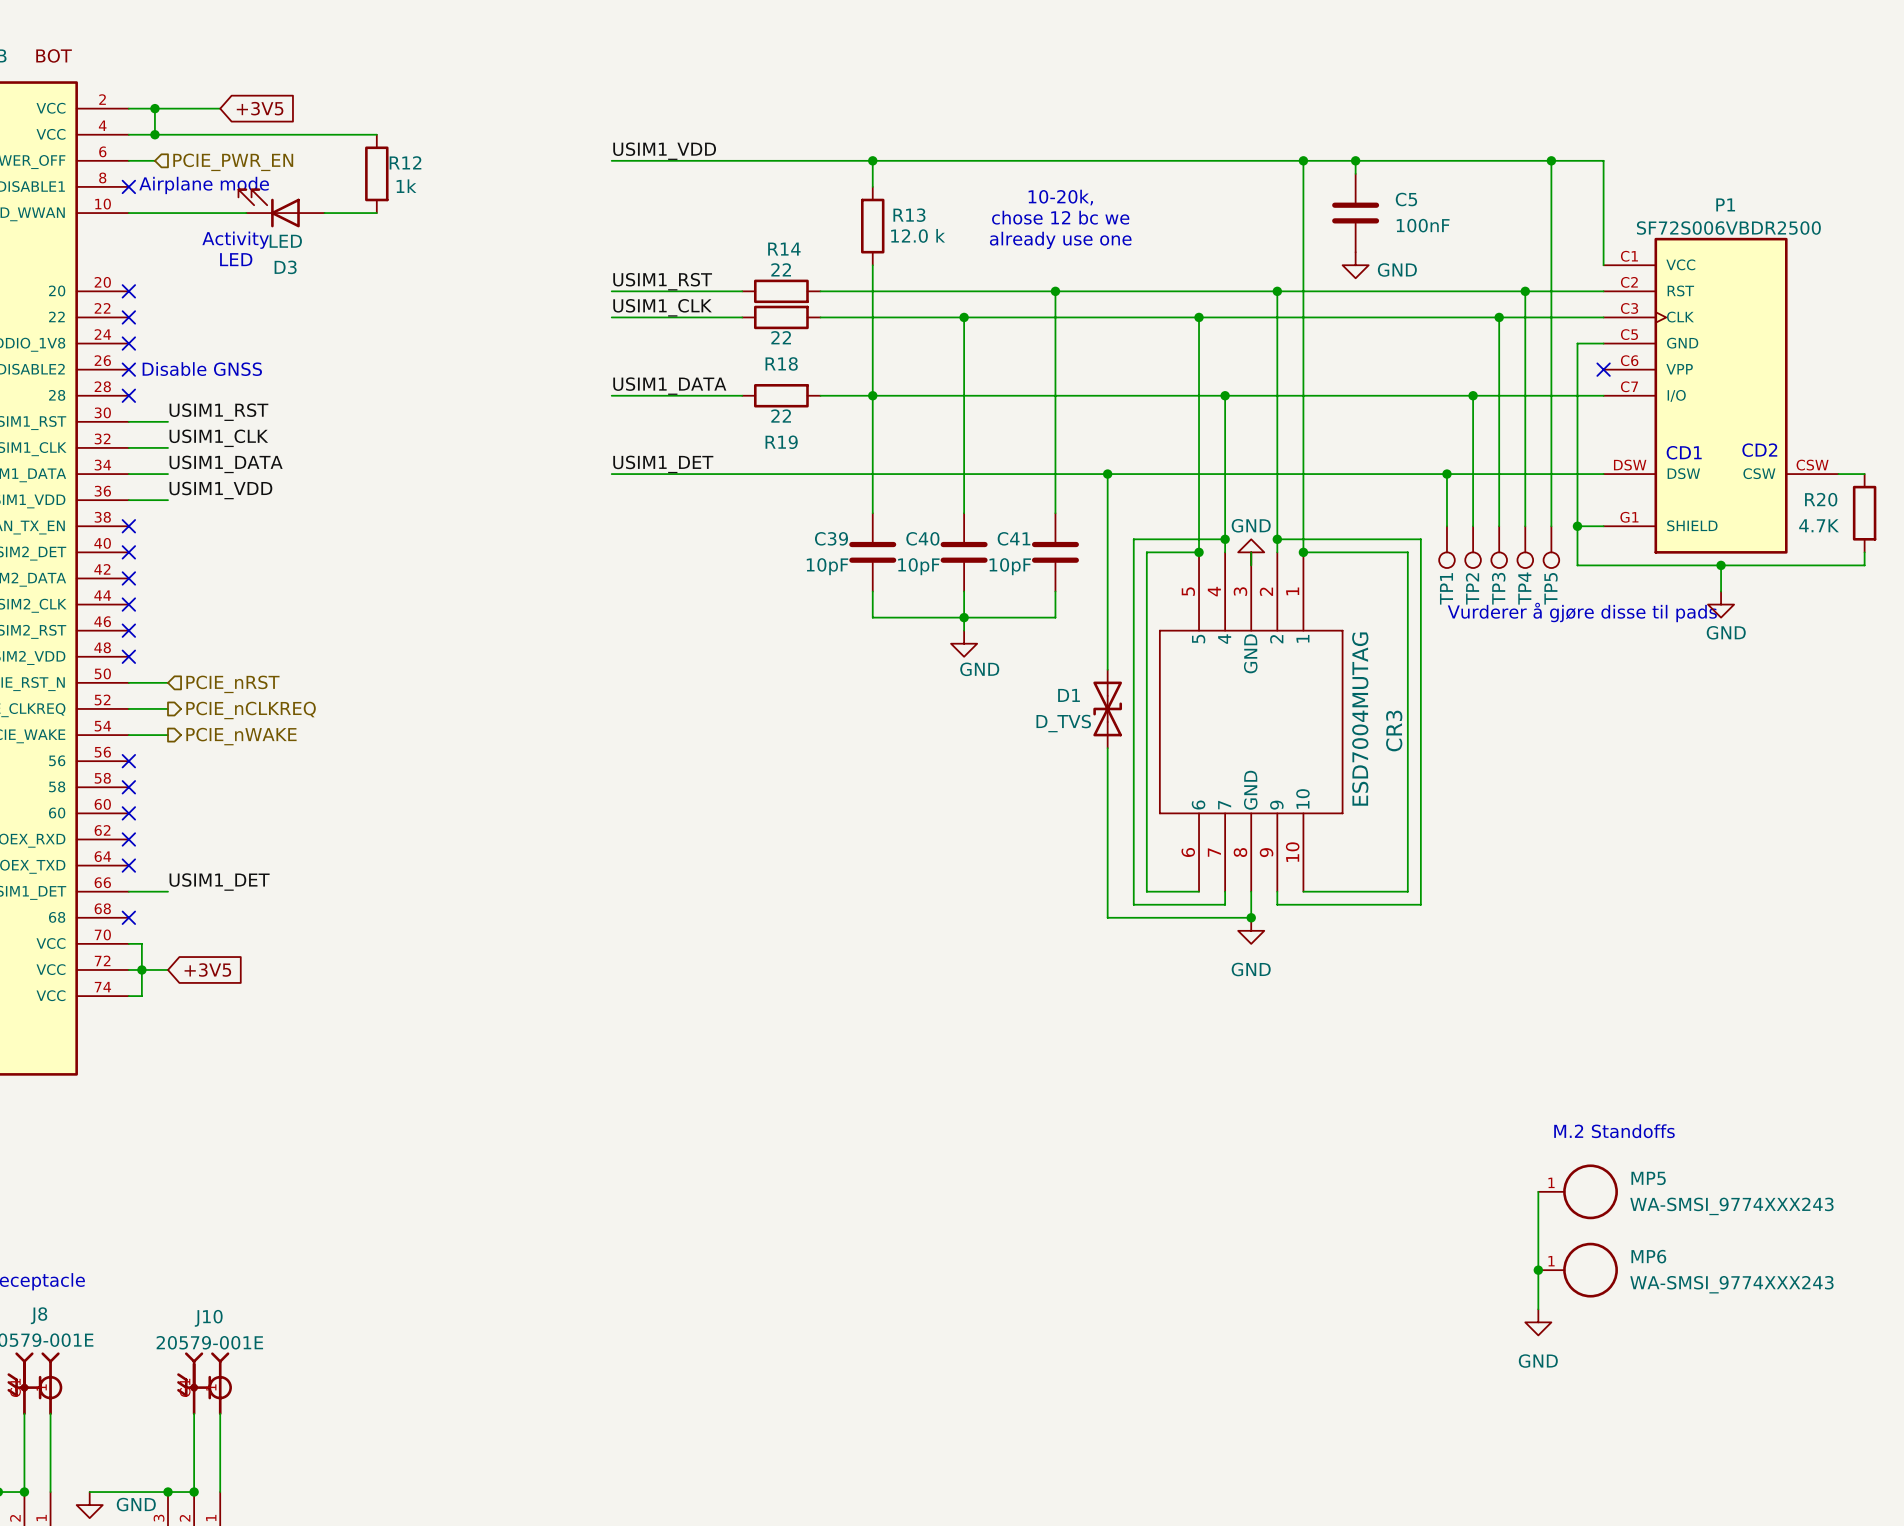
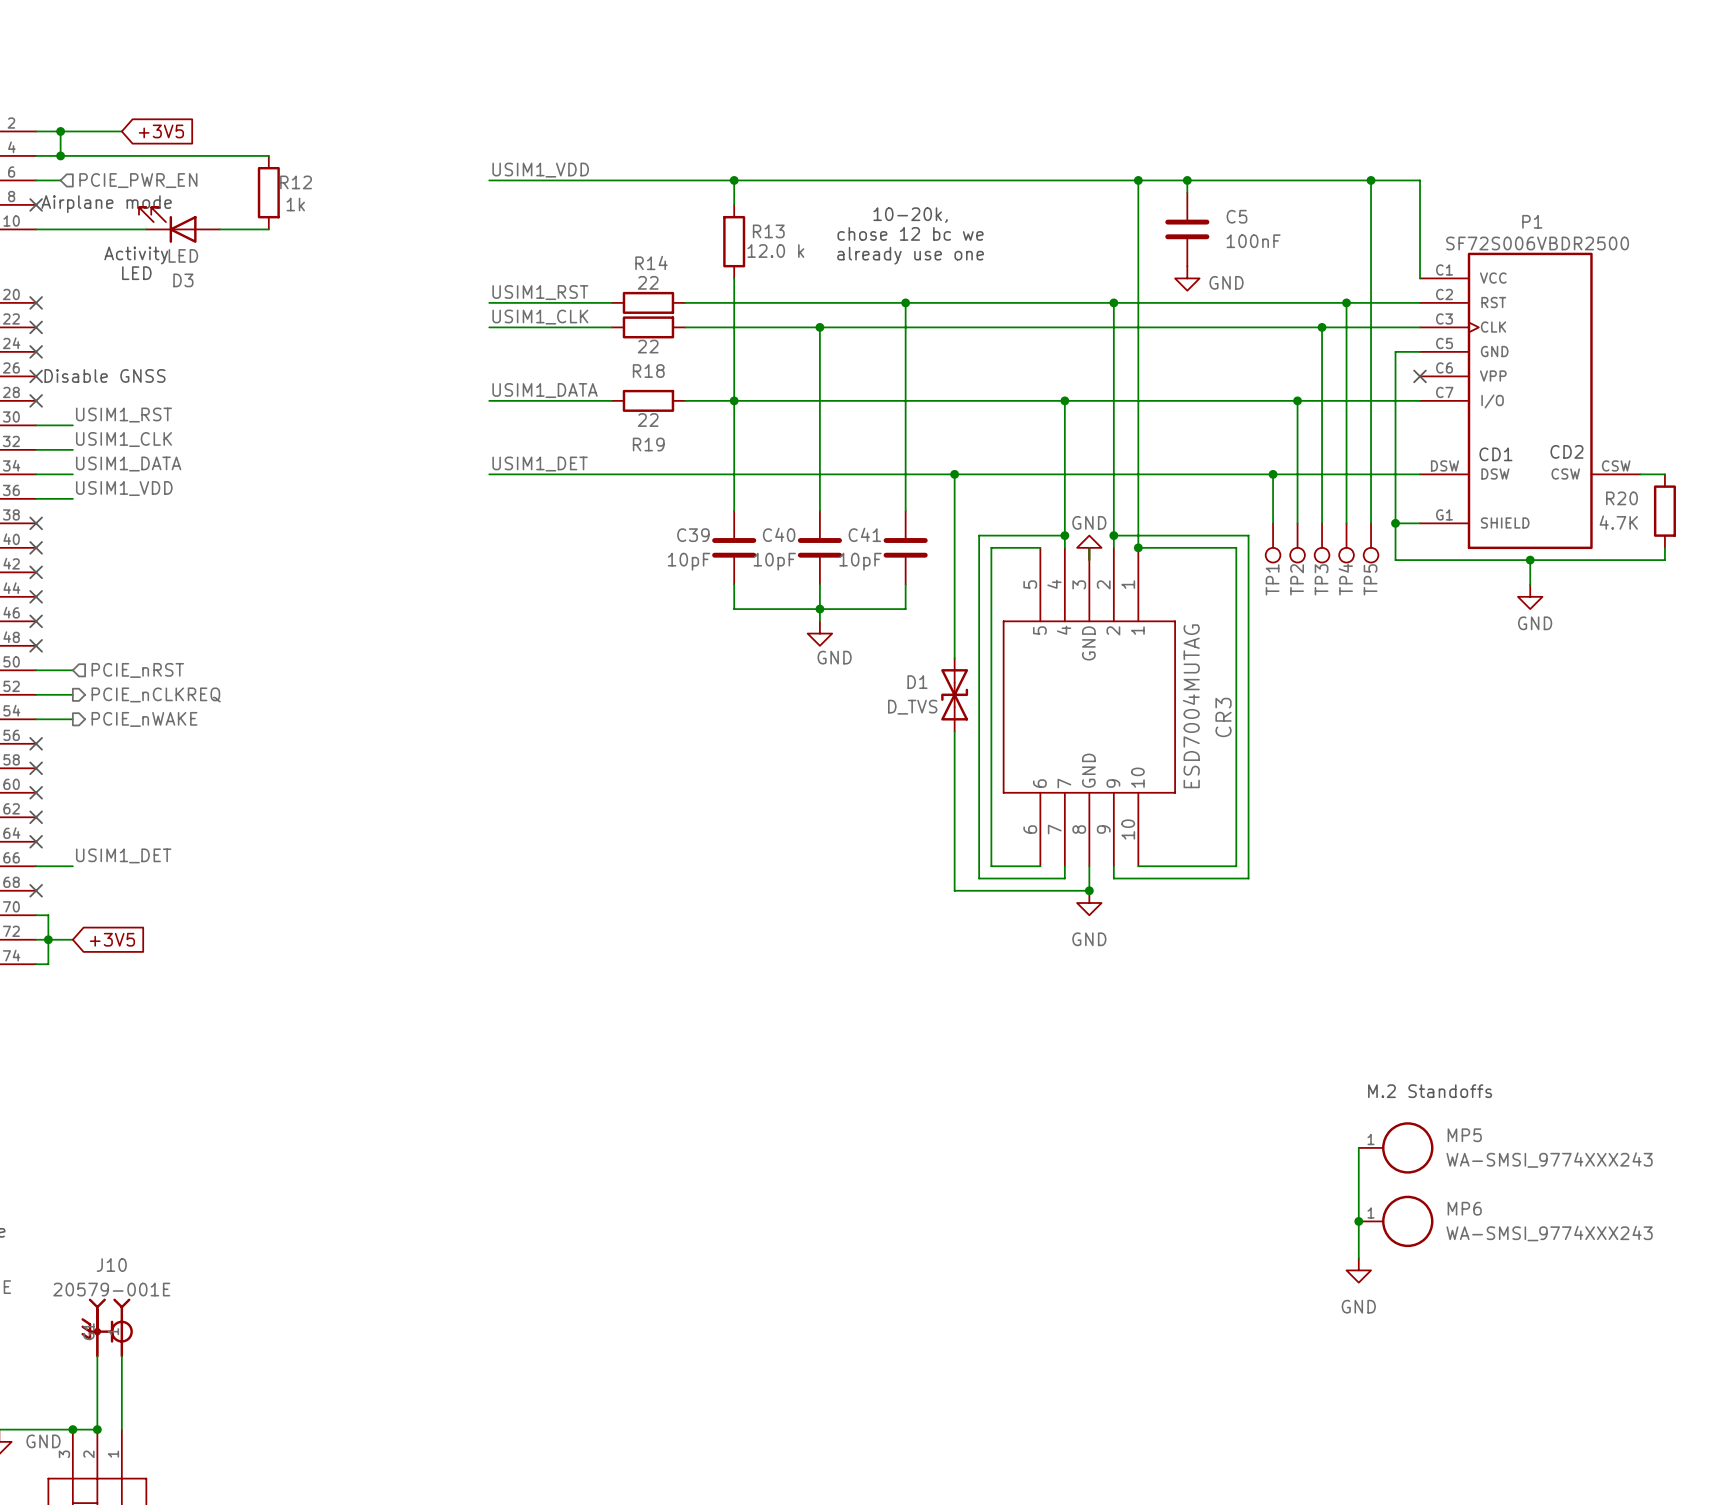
wire: (1199, 317) (1199, 552) -> none
junction: (1199, 317) -> none
junction: (1199, 552) -> none
text: Vurderer å gjøre disse til pads (1582, 612) -> none

